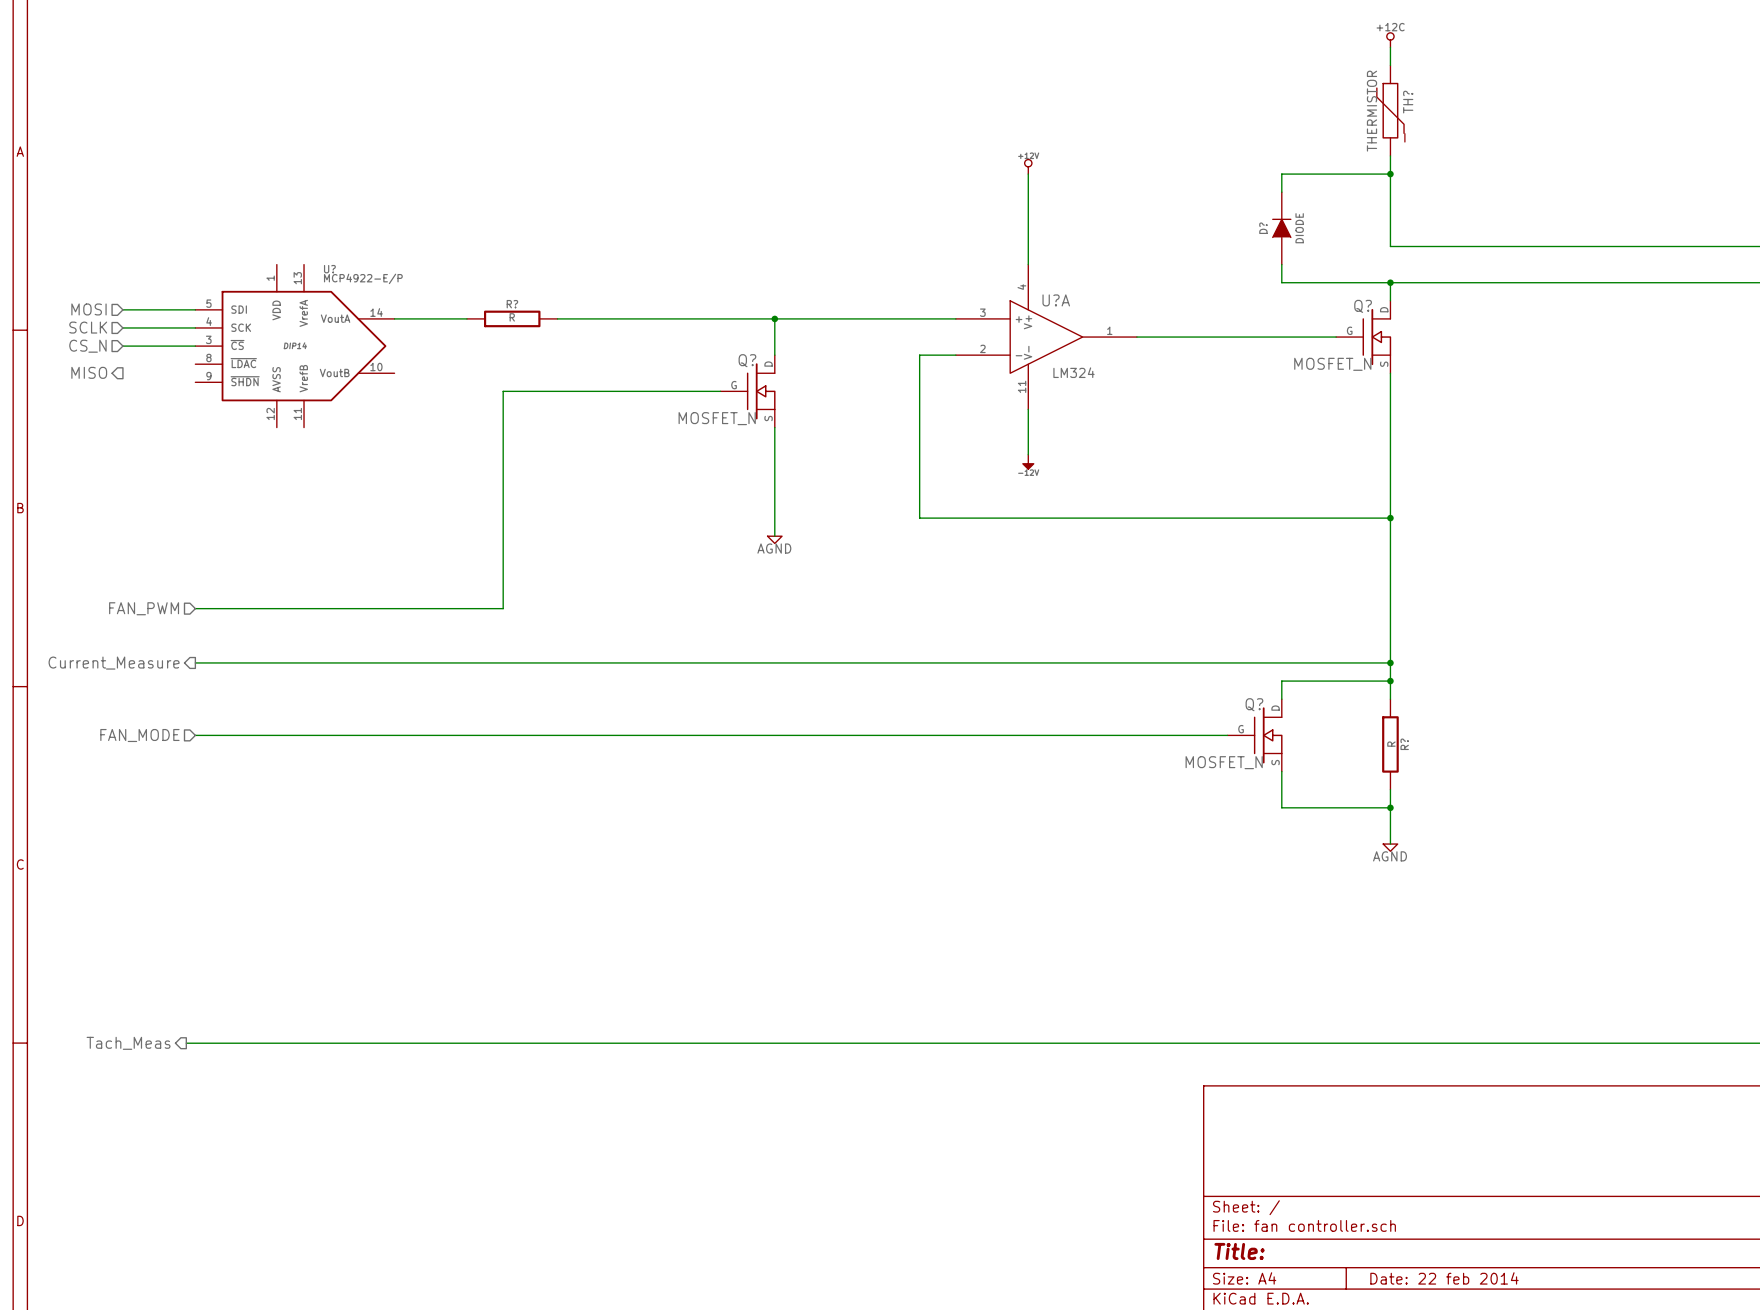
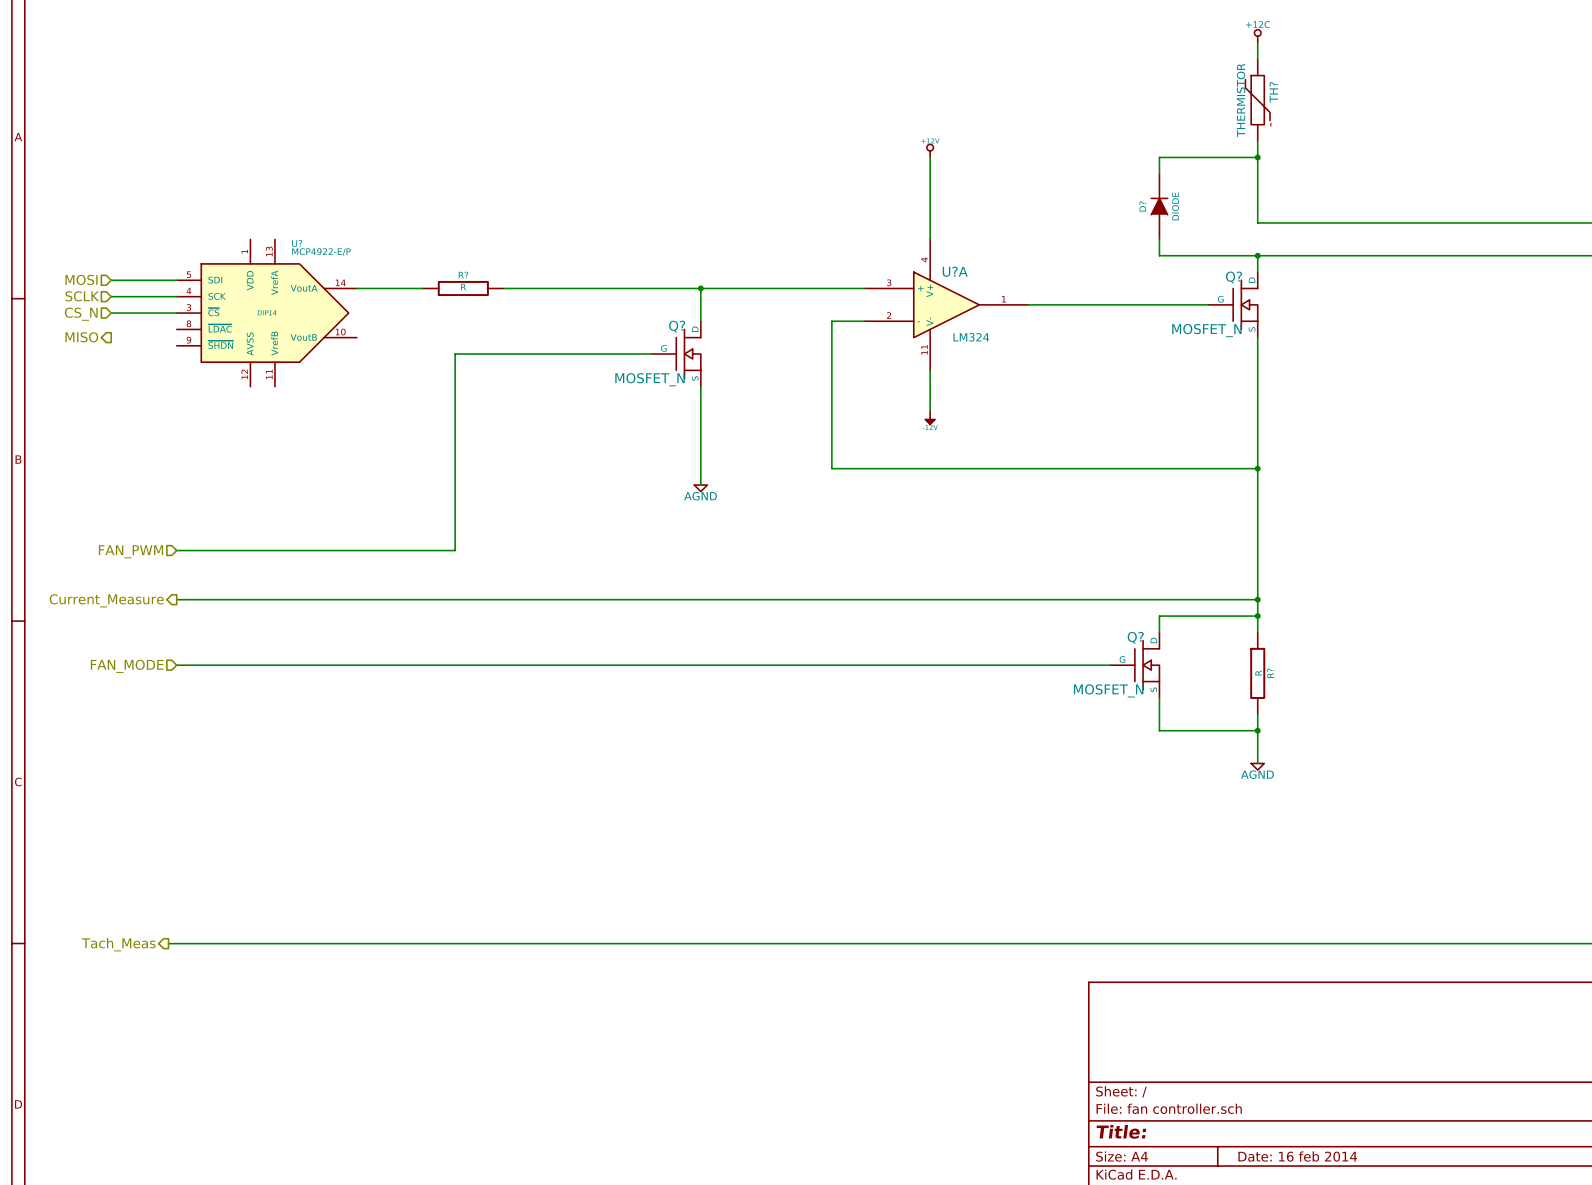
title block: Date: 22 feb 2014 (1444, 1278) -> Date: 16 feb 2014 (1297, 1156)

